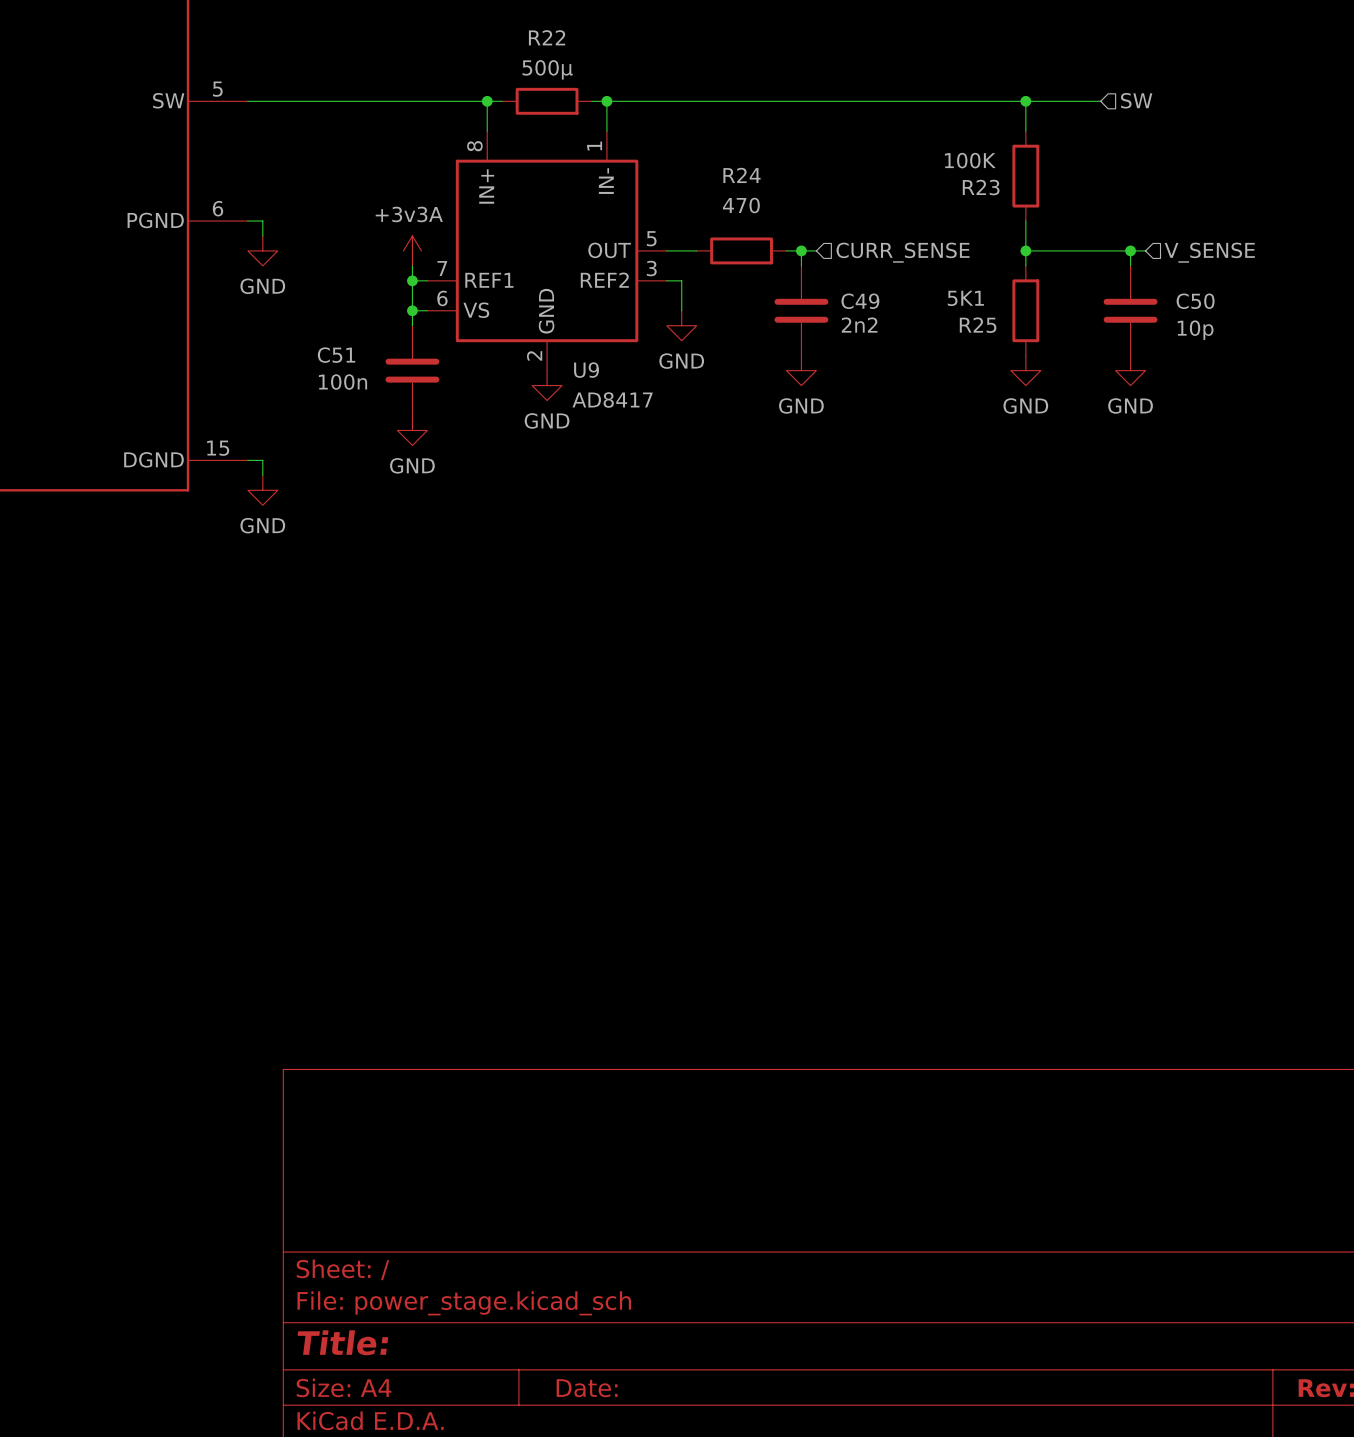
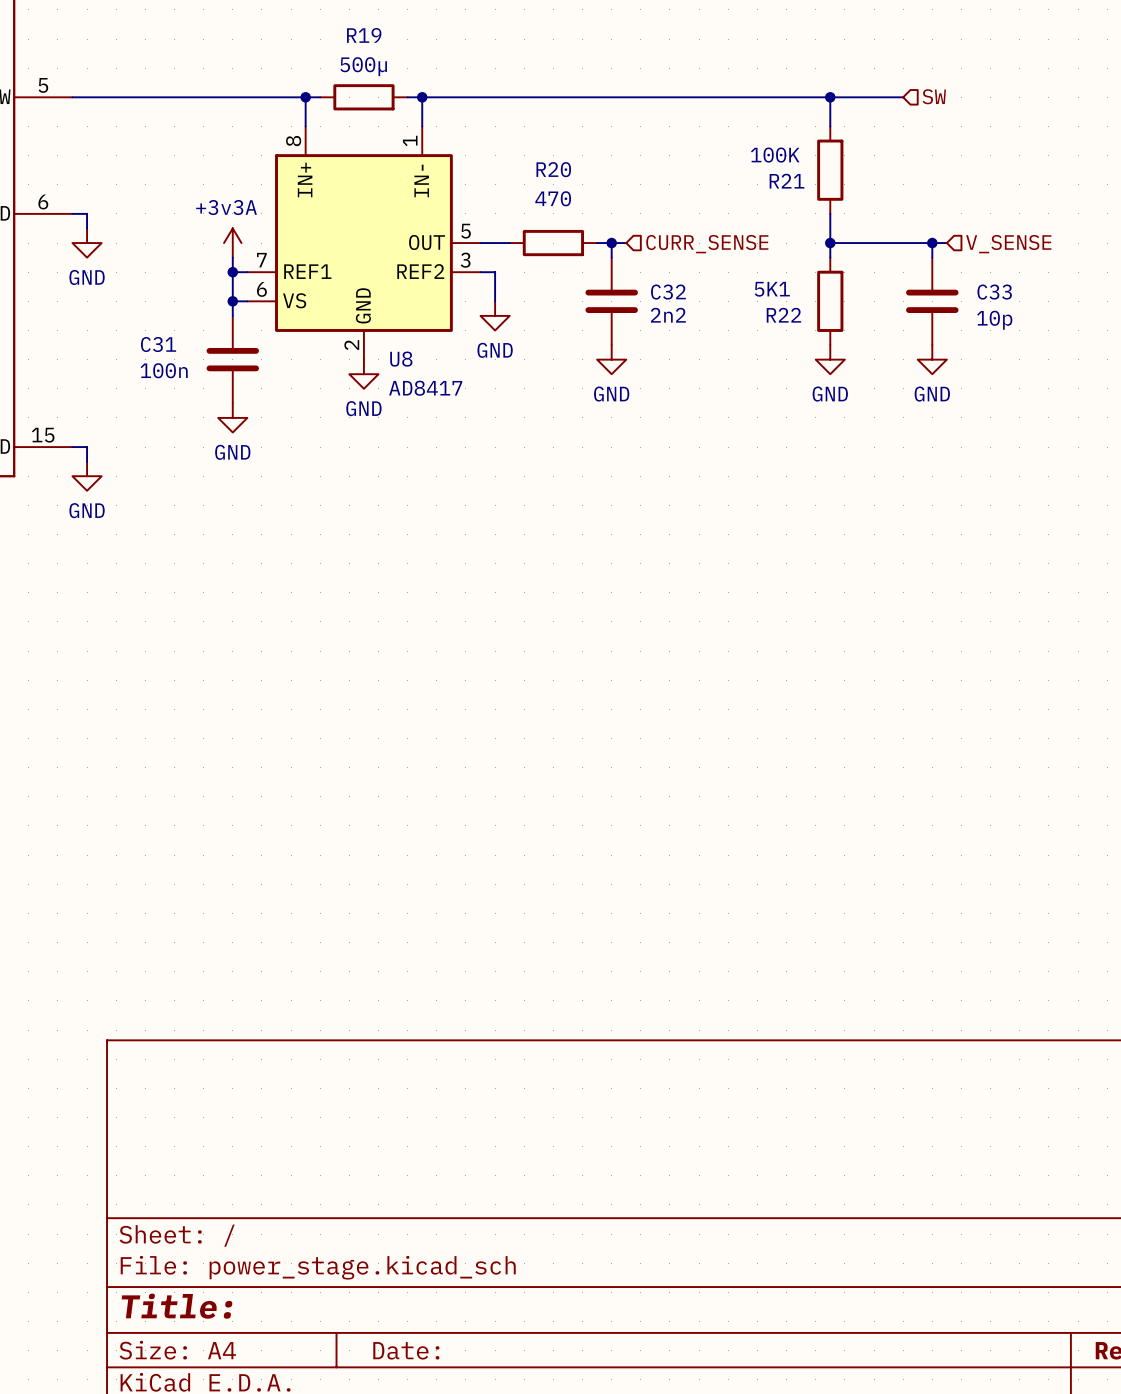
R22 name: R22 (547, 37) -> R19 (364, 35)
R24 name: R24 (742, 175) -> R20 (553, 169)
R23 name: R23 (981, 187) -> R21 (787, 181)
C49 name: C49 (860, 301) -> C32 (668, 292)
C50 name: C50 (1195, 301) -> C33 (994, 292)
R25 name: R25 (978, 325) -> R22 (783, 315)
C51 name: C51 (336, 355) -> C31 (158, 344)
U9 name: U9 (586, 370) -> U8 (401, 359)

